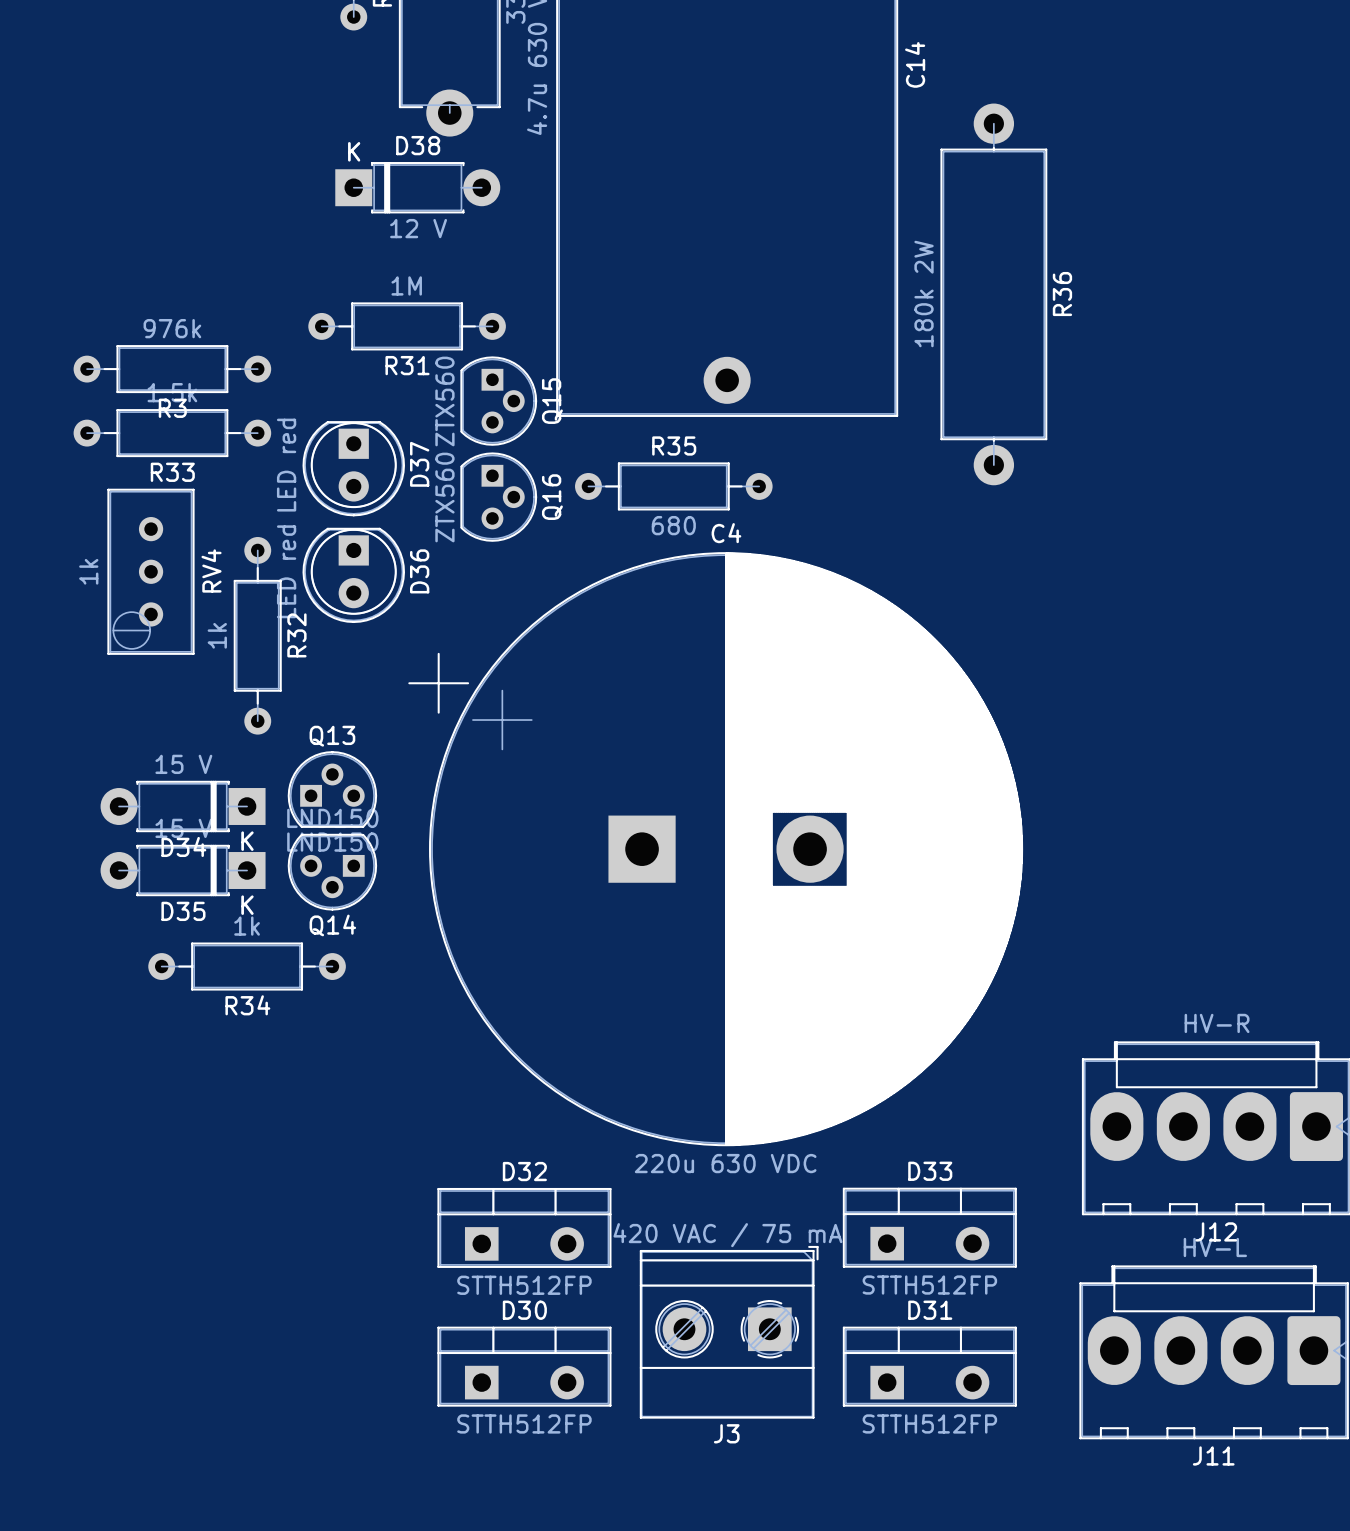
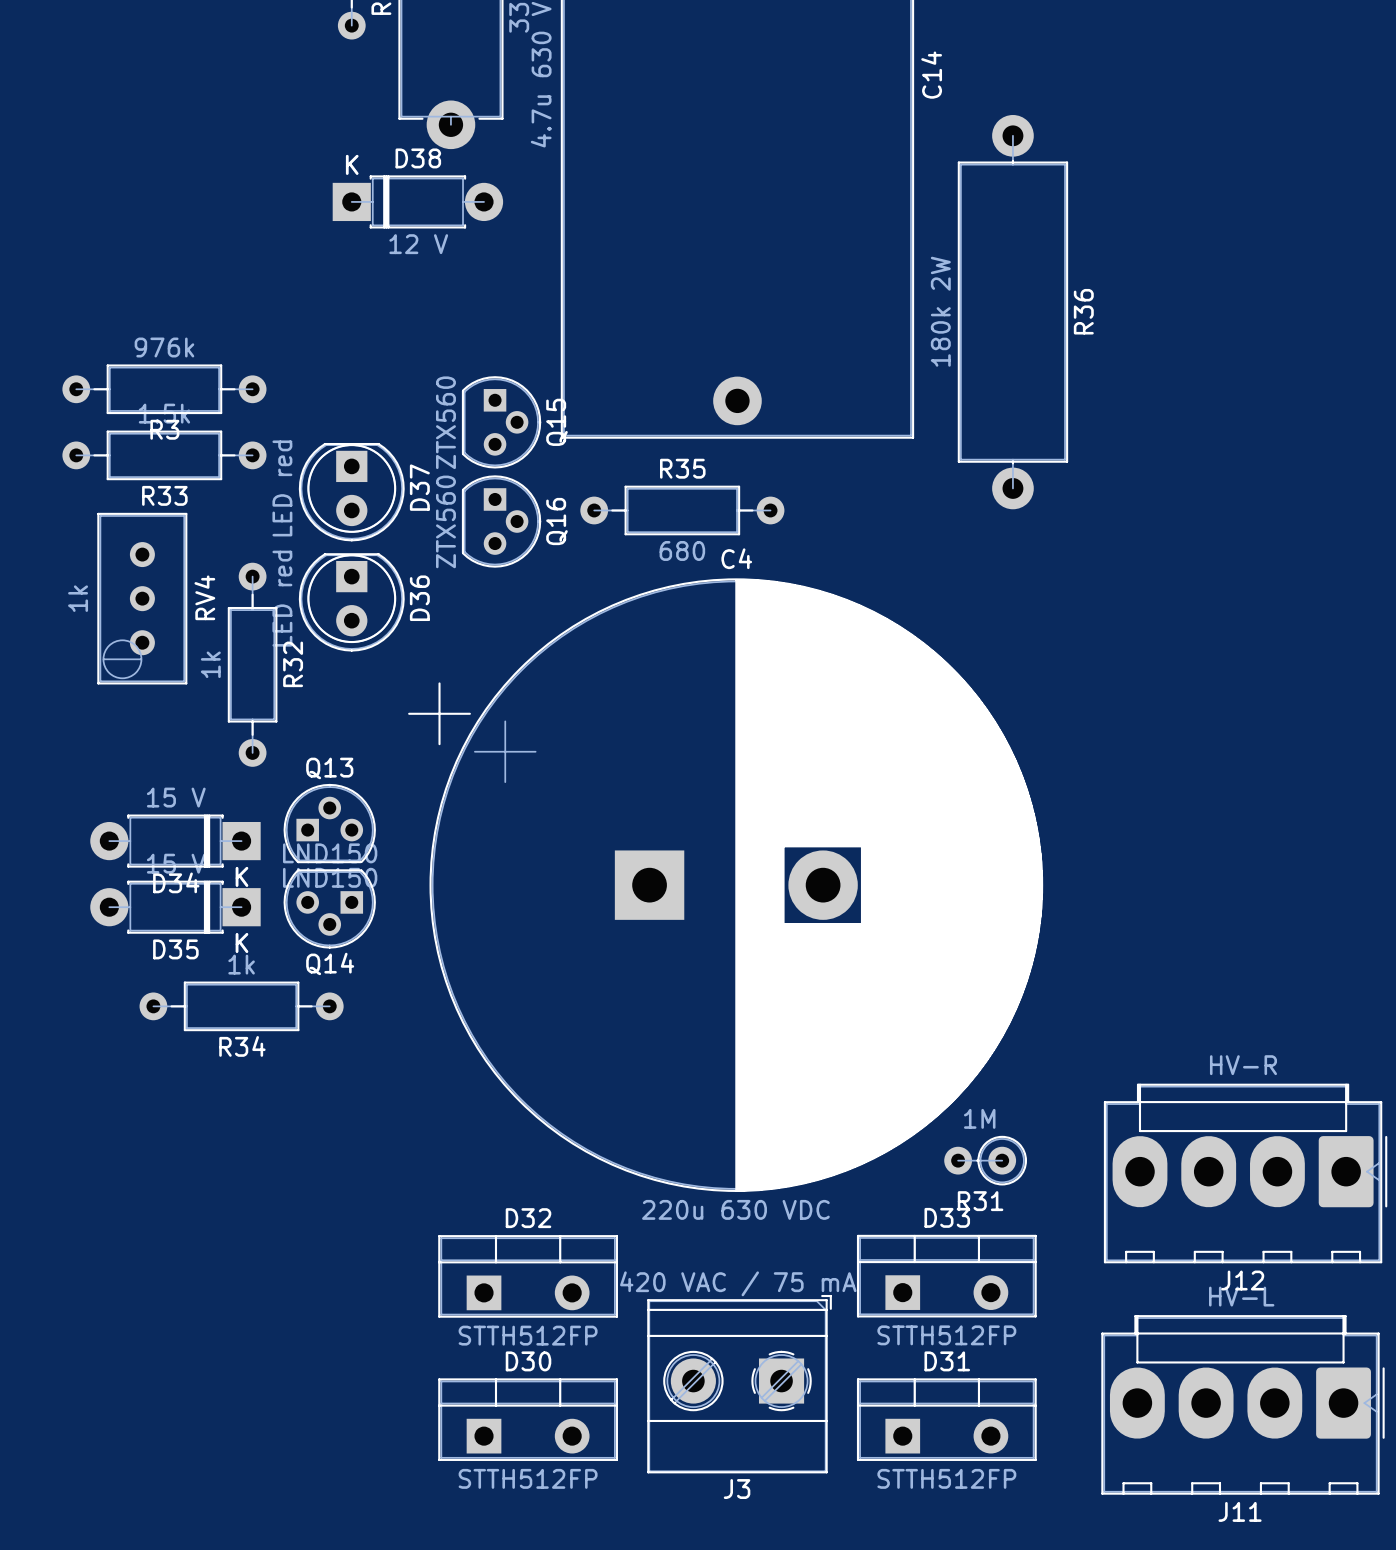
R31 footprint: [308, 302, 506, 351] -> [944, 1135, 1028, 1186]

